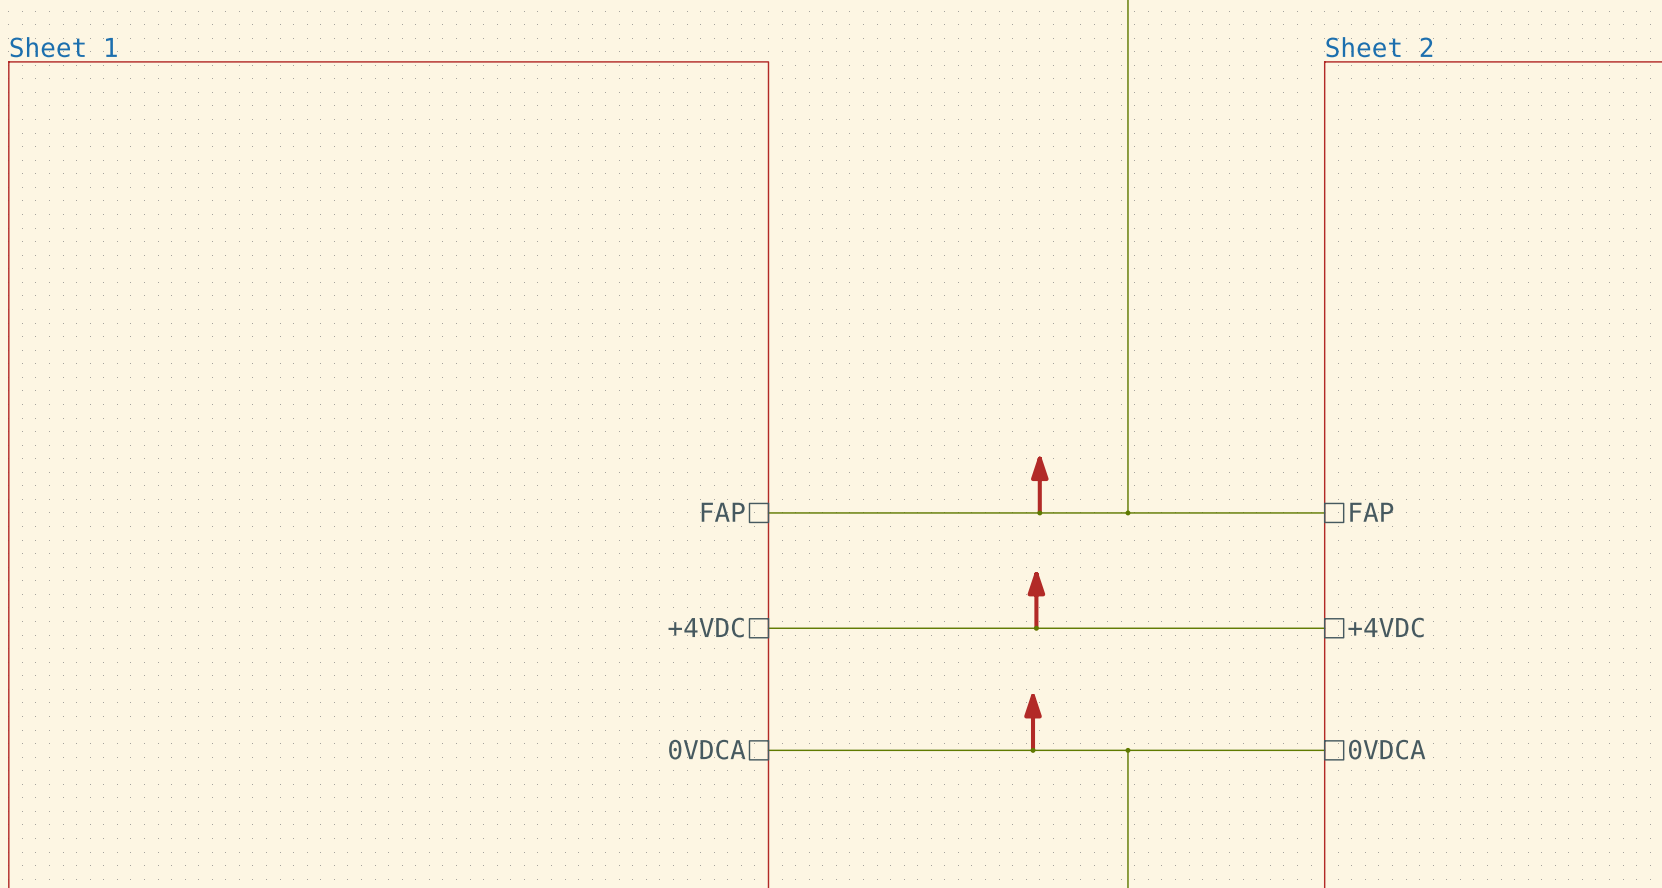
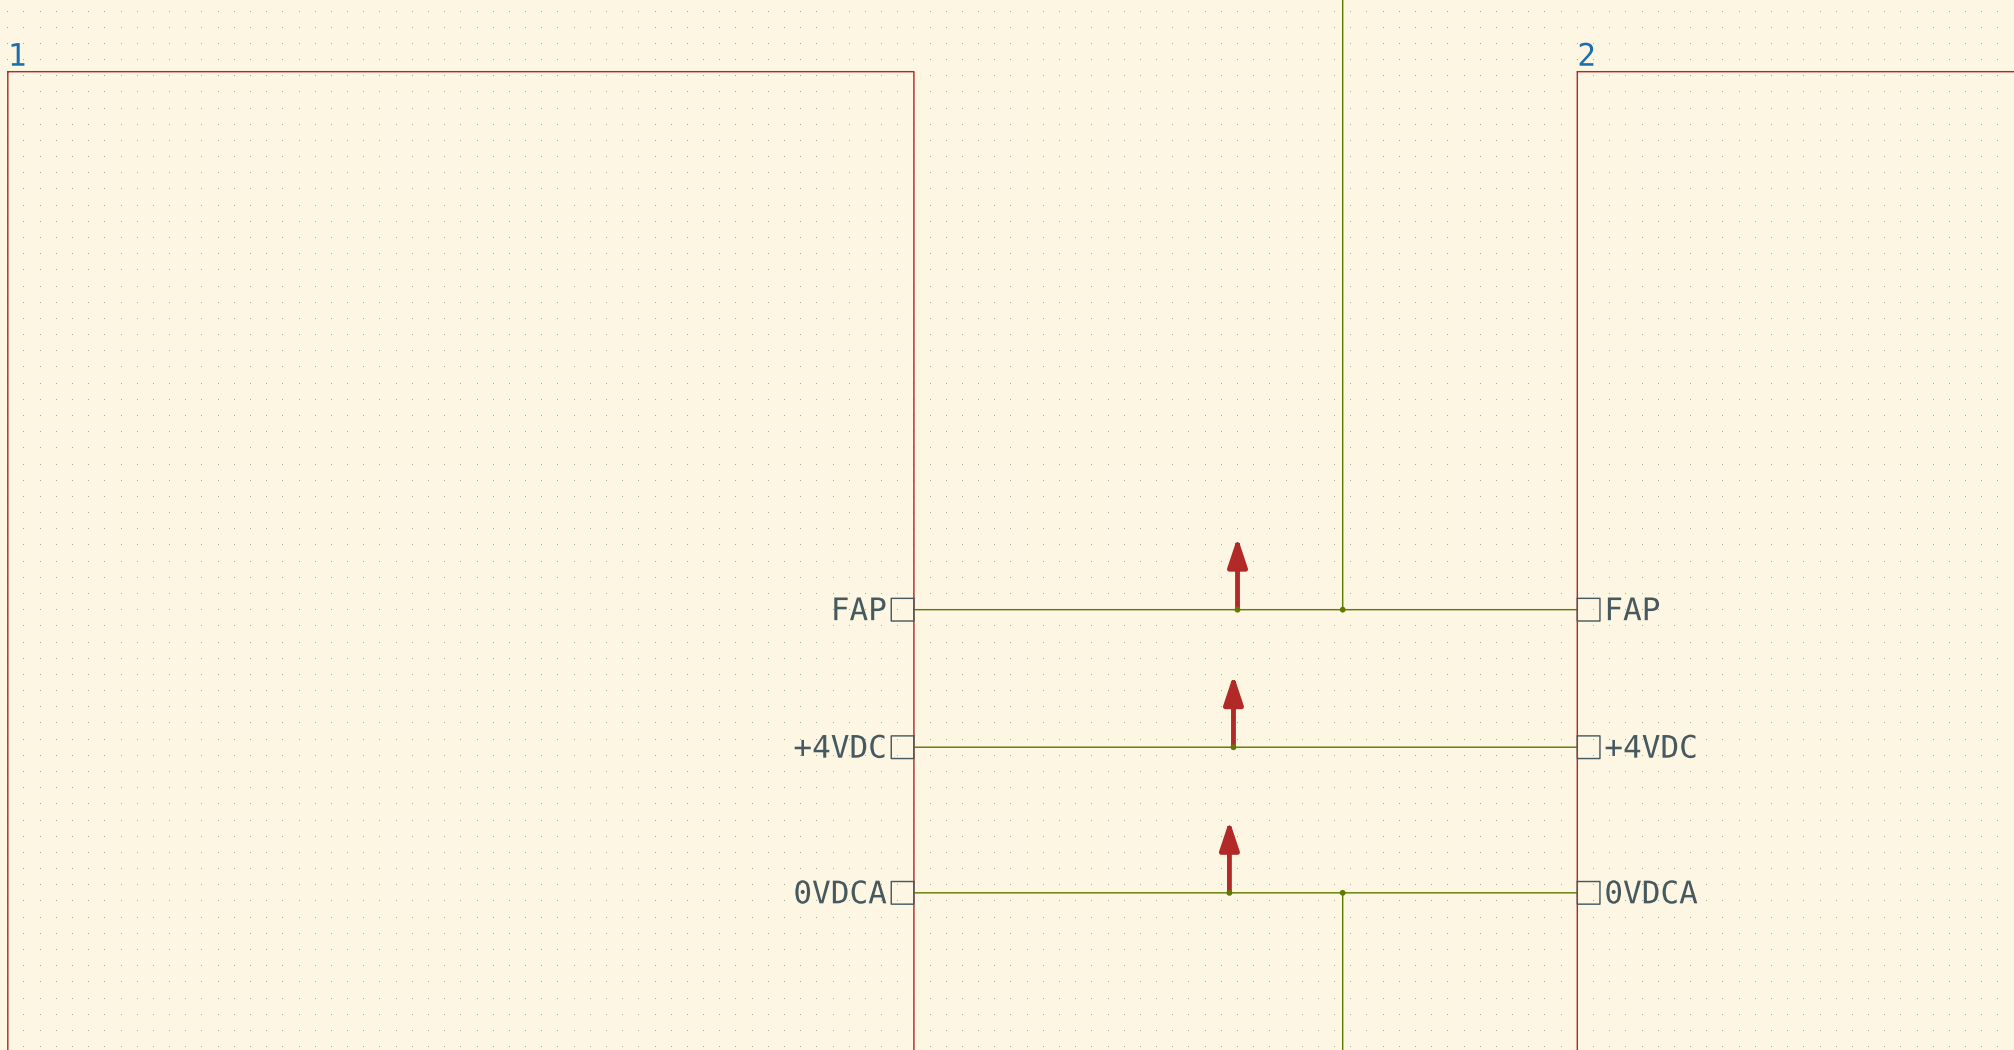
sheet Sheet 1 name: Sheet 1 (63, 47) -> 1 (17, 54)
sheet Sheet 2 name: Sheet 2 (1379, 47) -> 2 (1586, 54)

